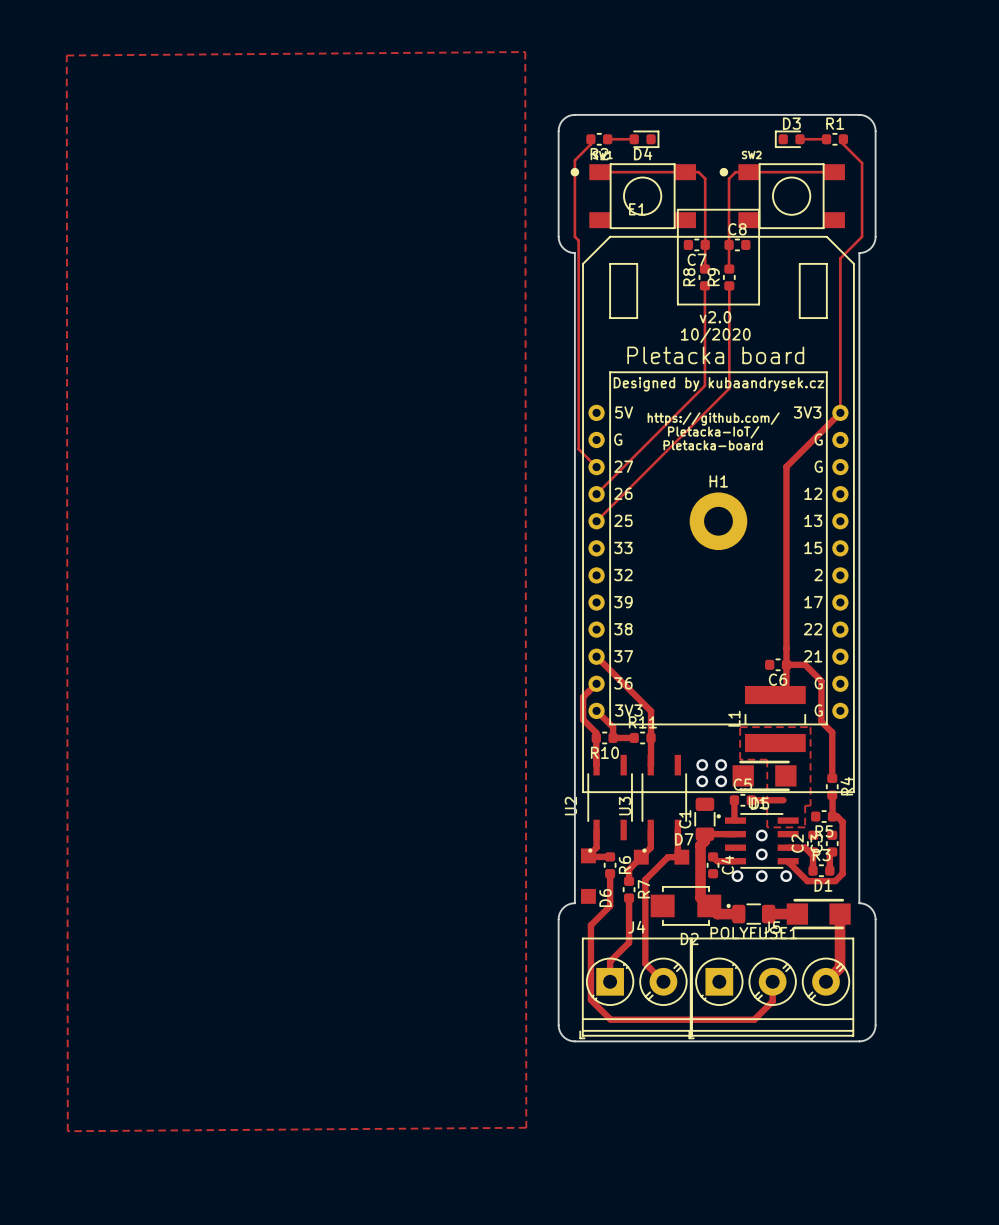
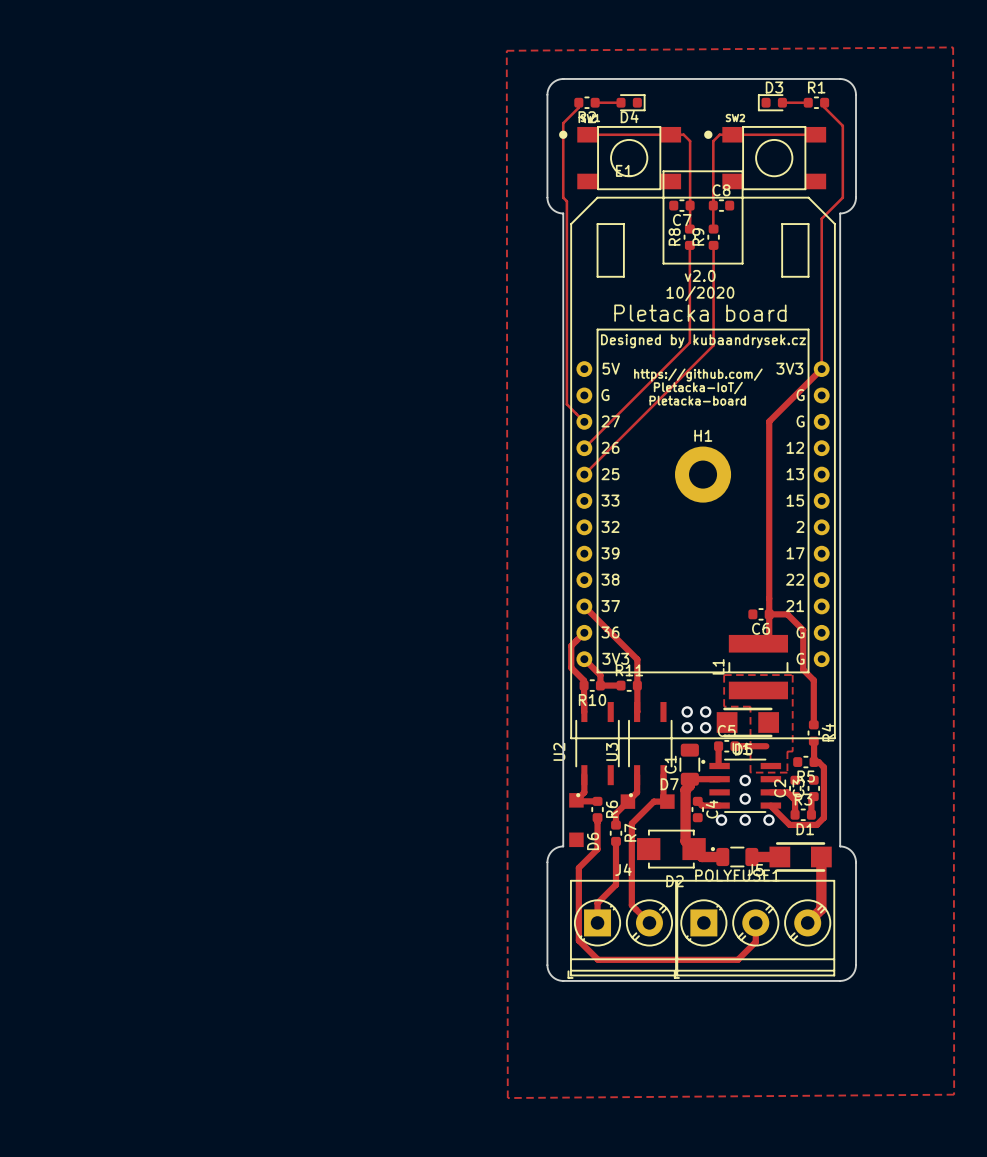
top zone outline: (525, 52) (66, 55) (67, 1131) (526, 1127) (525, 52) -> none
top zone outline: none -> (953, 47) (506, 50) (507, 1098) (954, 1094) (953, 47)

